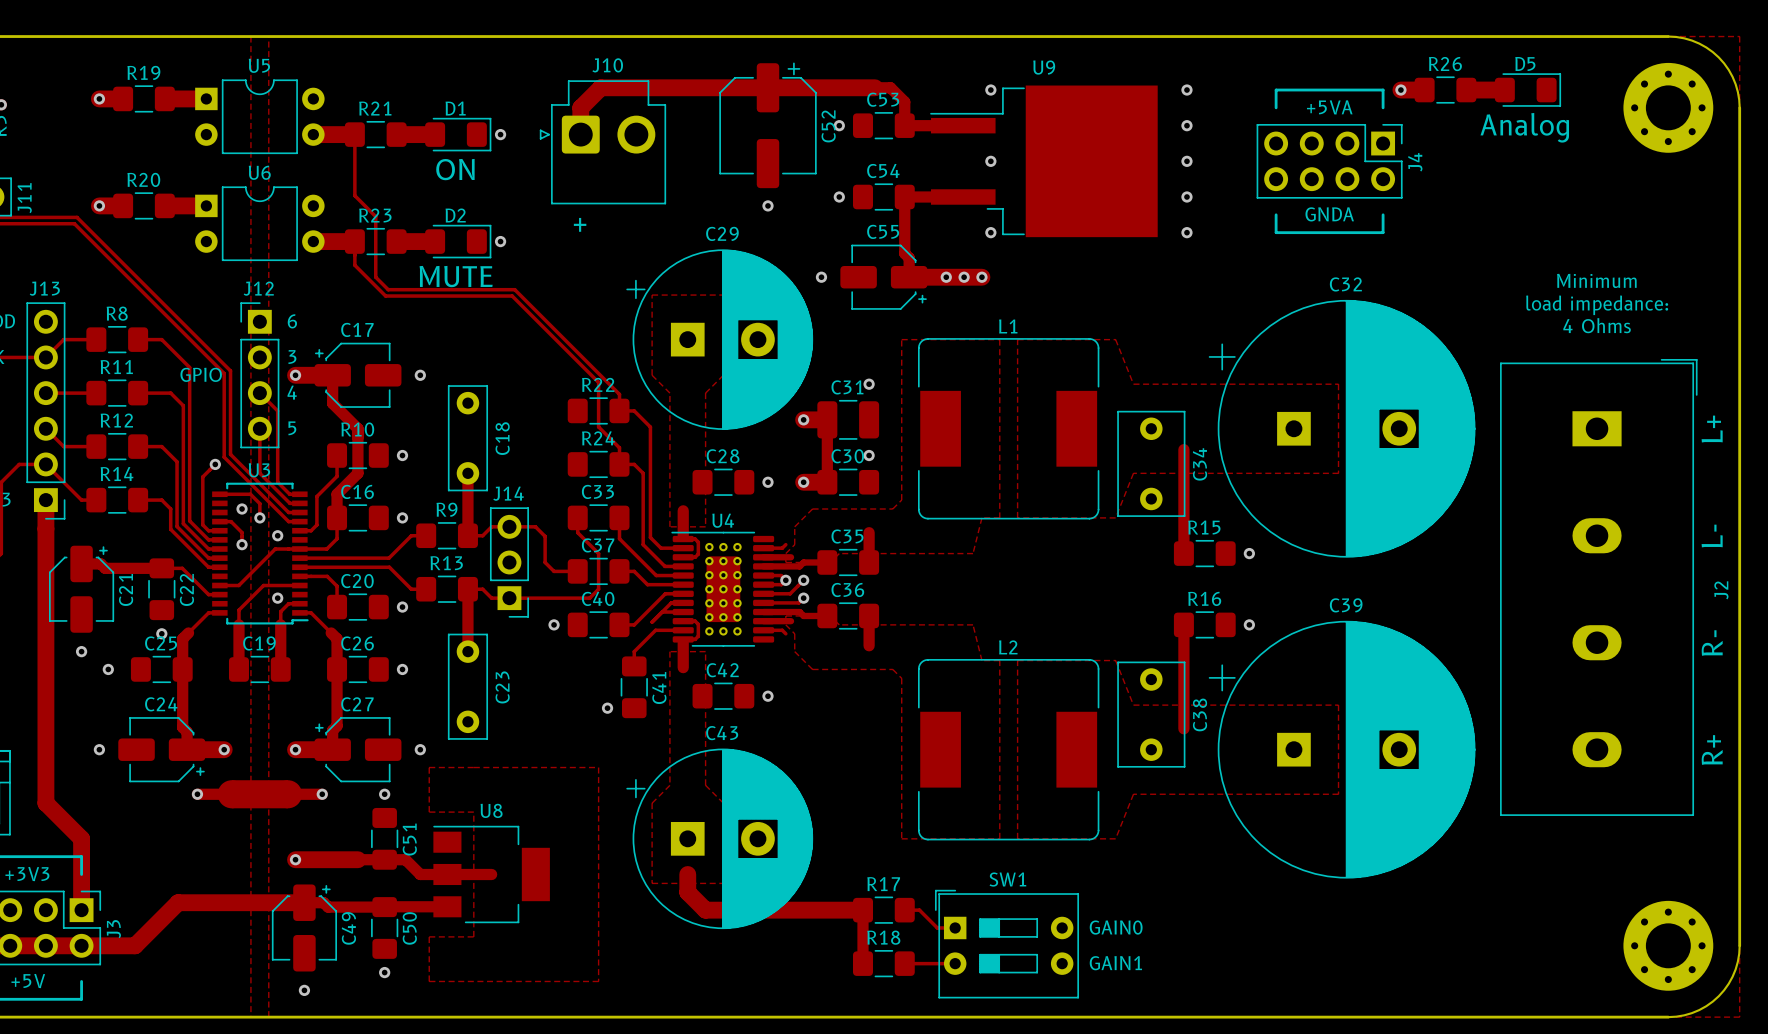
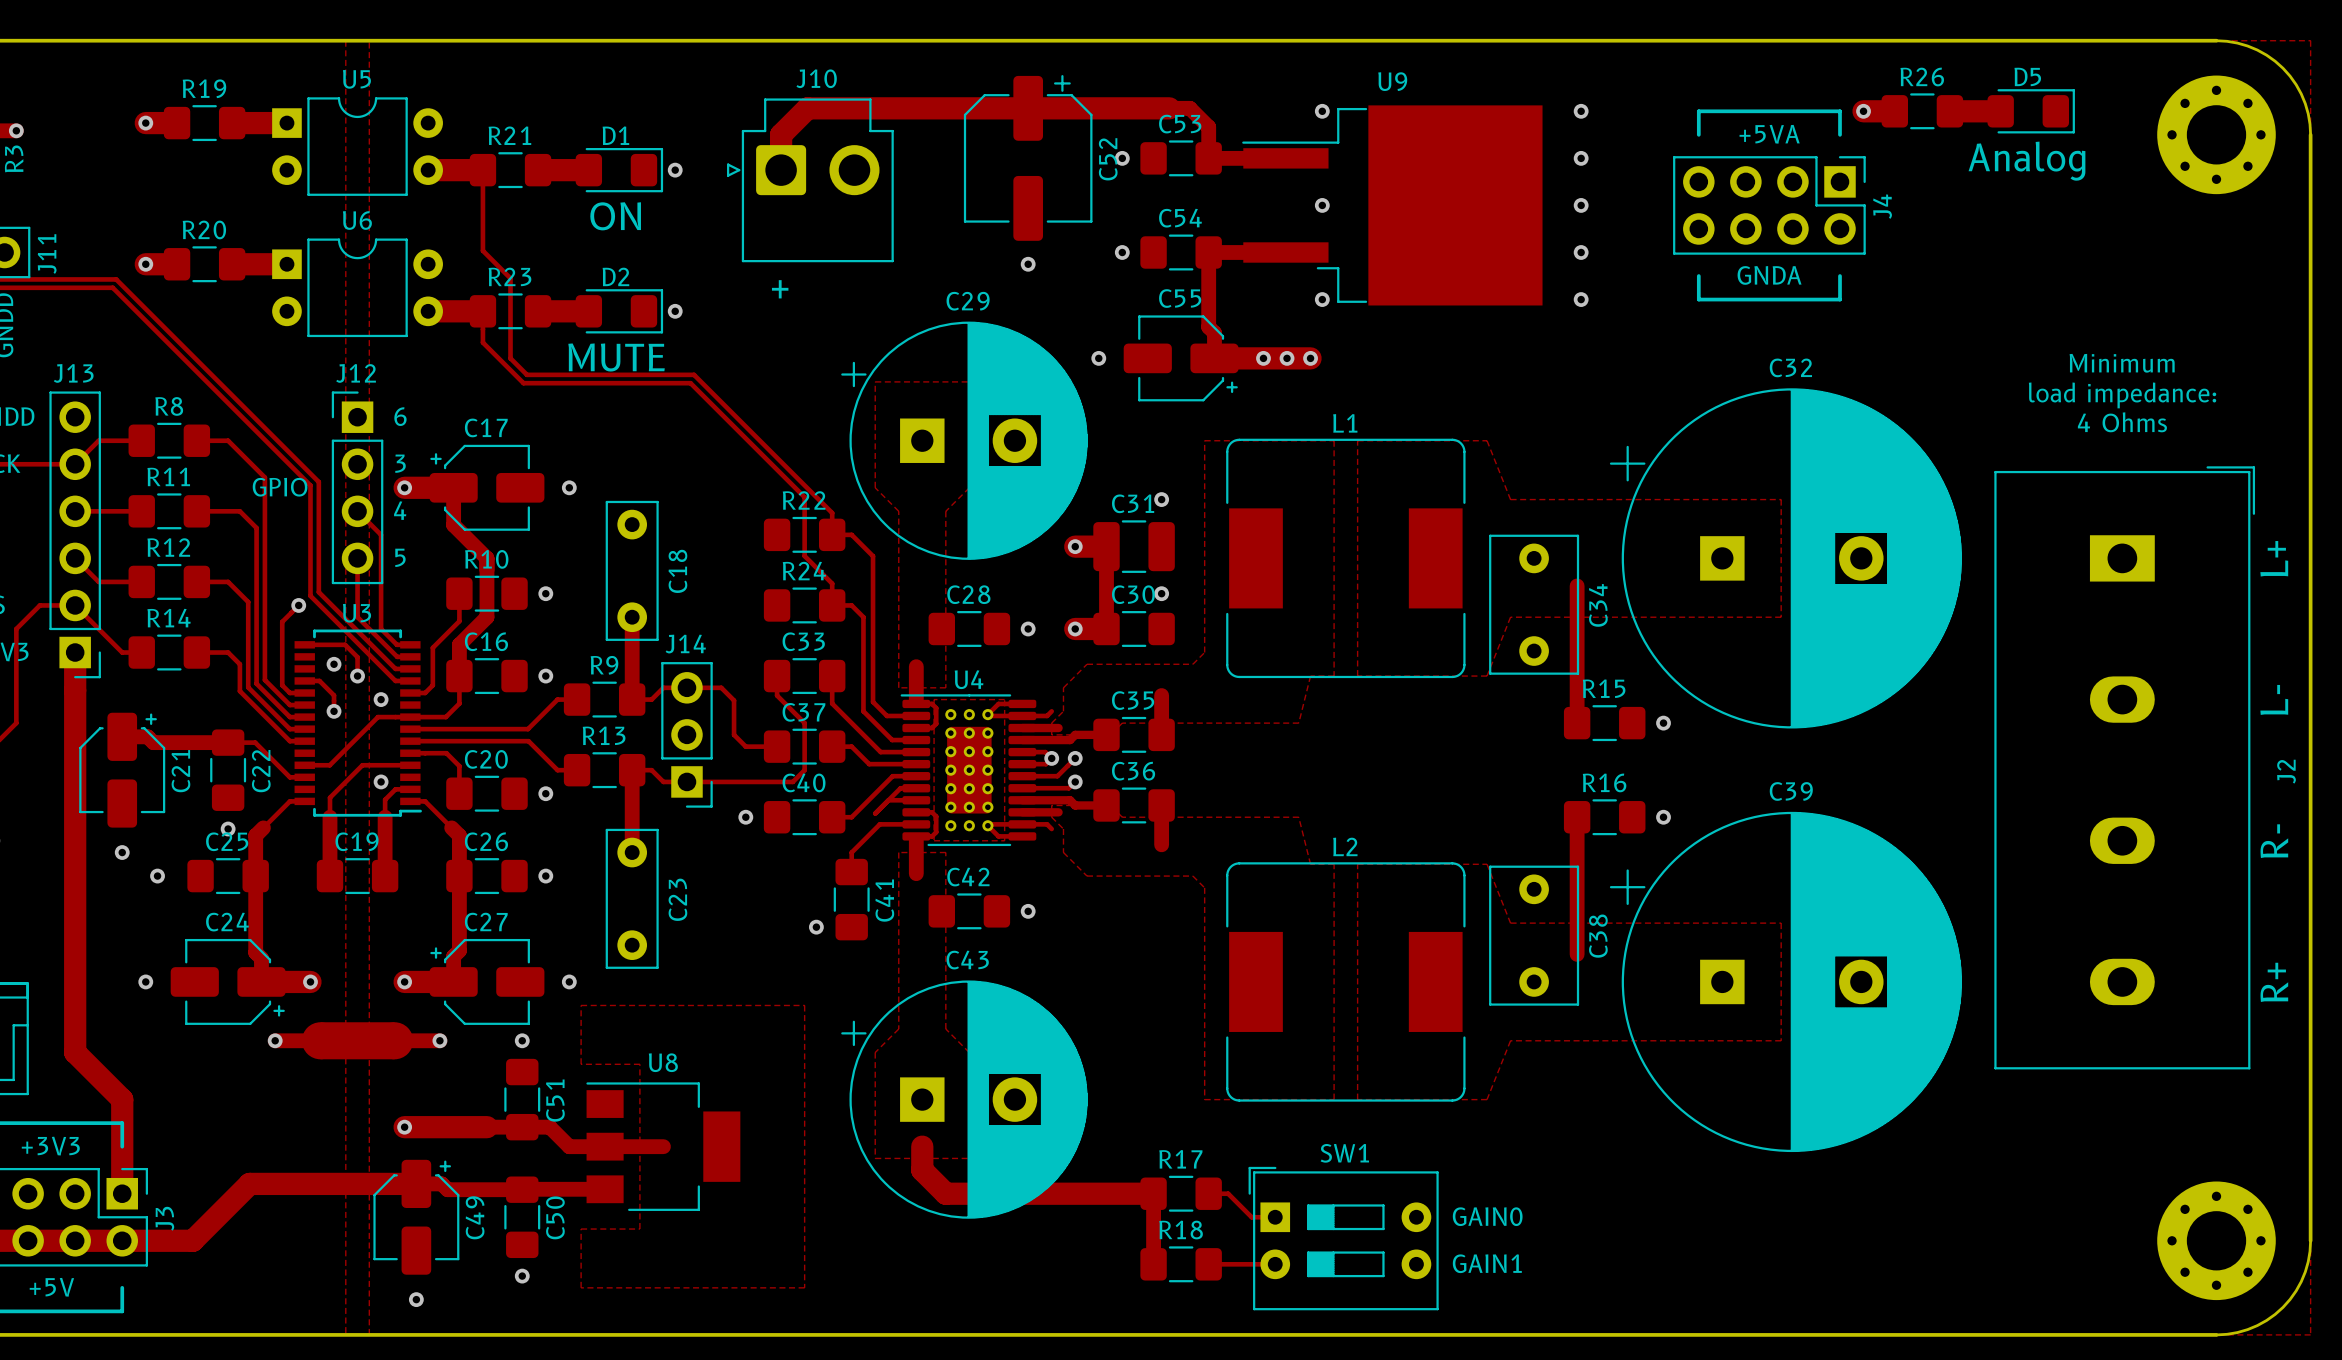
zone outline: none -> (934, 699) (1004, 699) (1004, 840) (934, 840) (934, 699)
track: none -> (1022, 703) (998, 703) (987, 714) (1022, 715)
track: none -> (1022, 824) (987, 825) (998, 836) (1022, 836)

